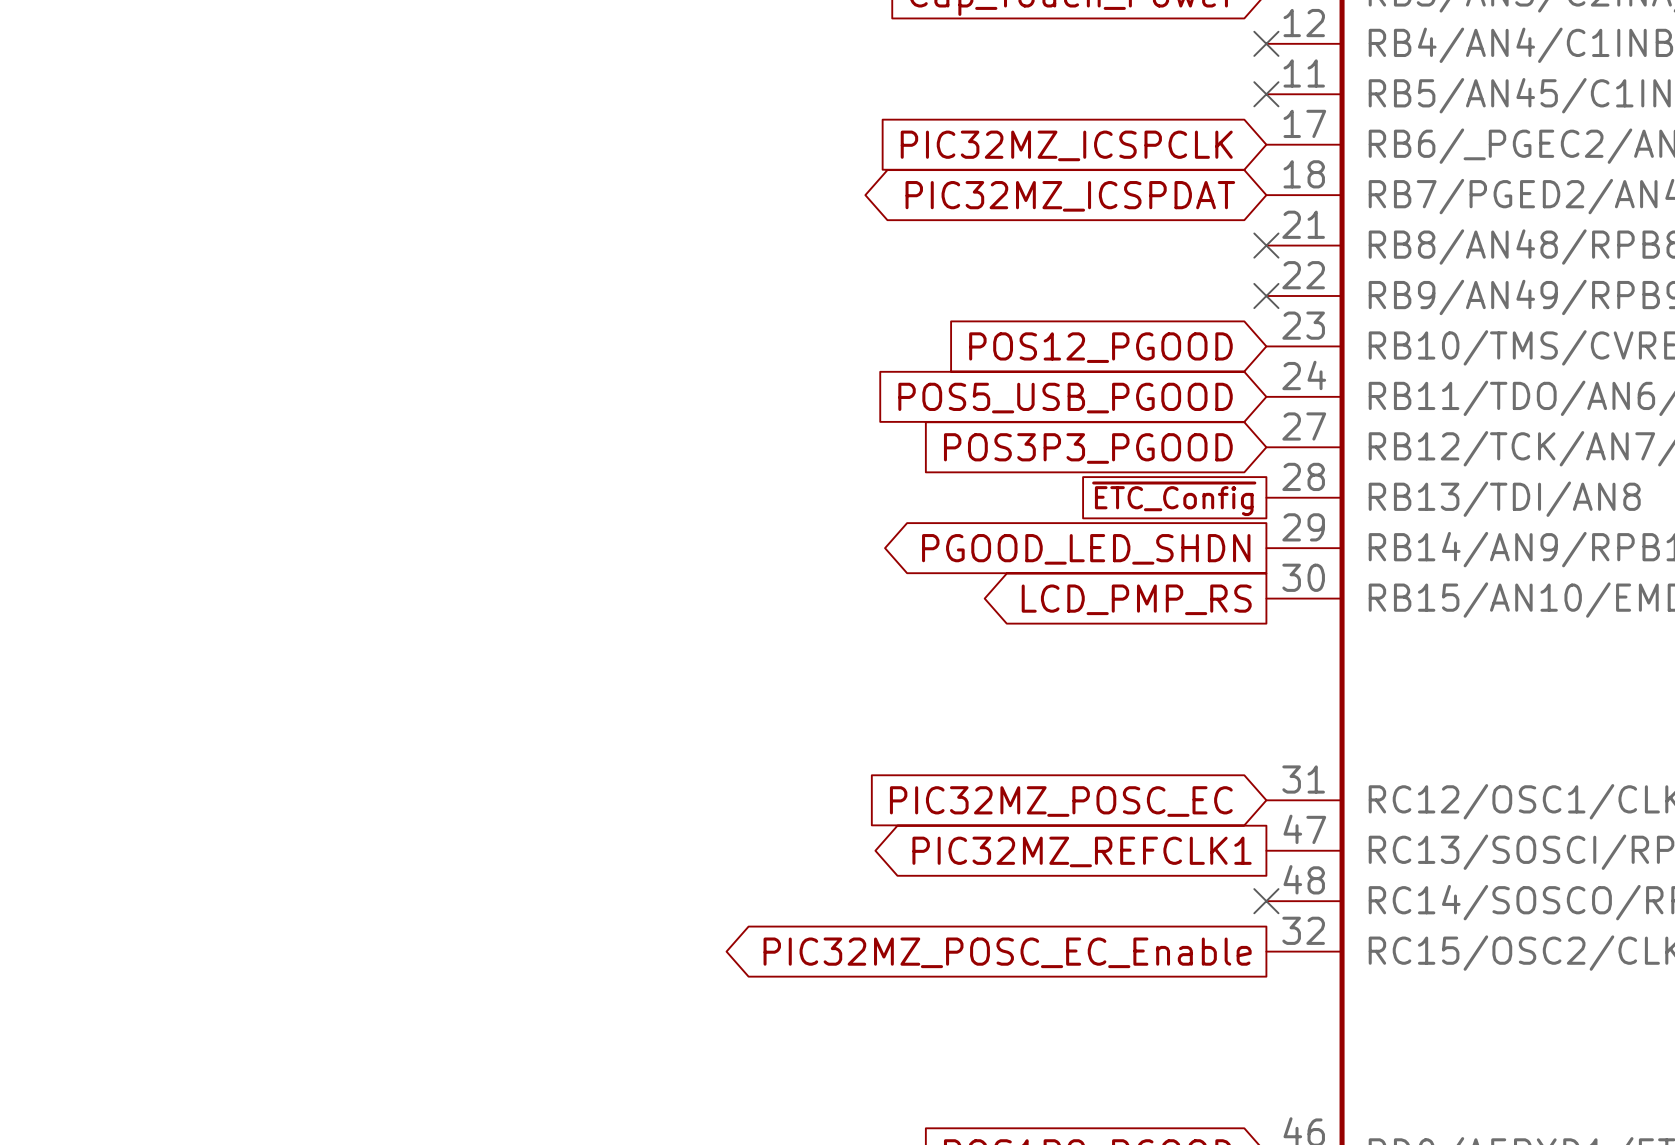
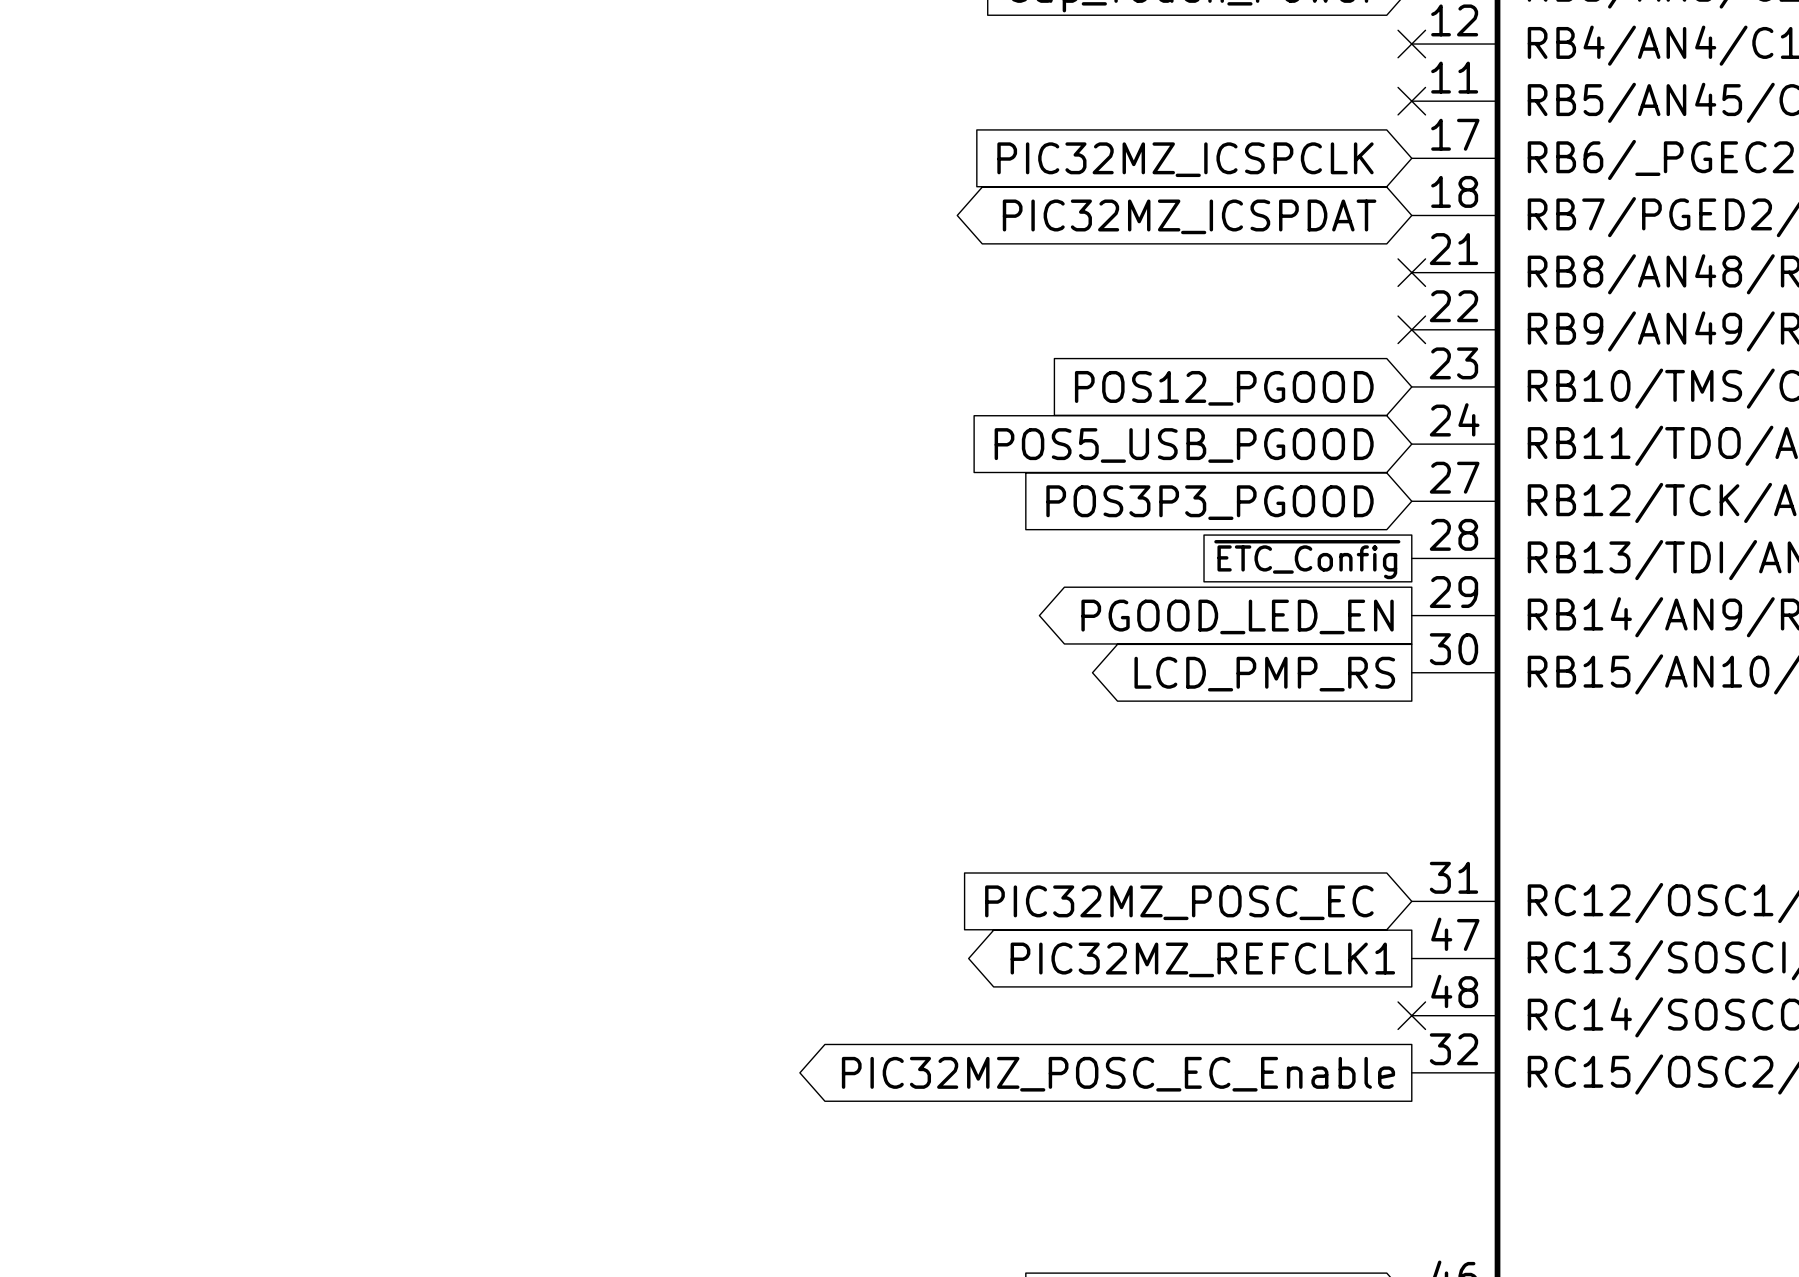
global label: PGOOD_LED_SHDN (1086, 549) -> PGOOD_LED_EN (1237, 616)

